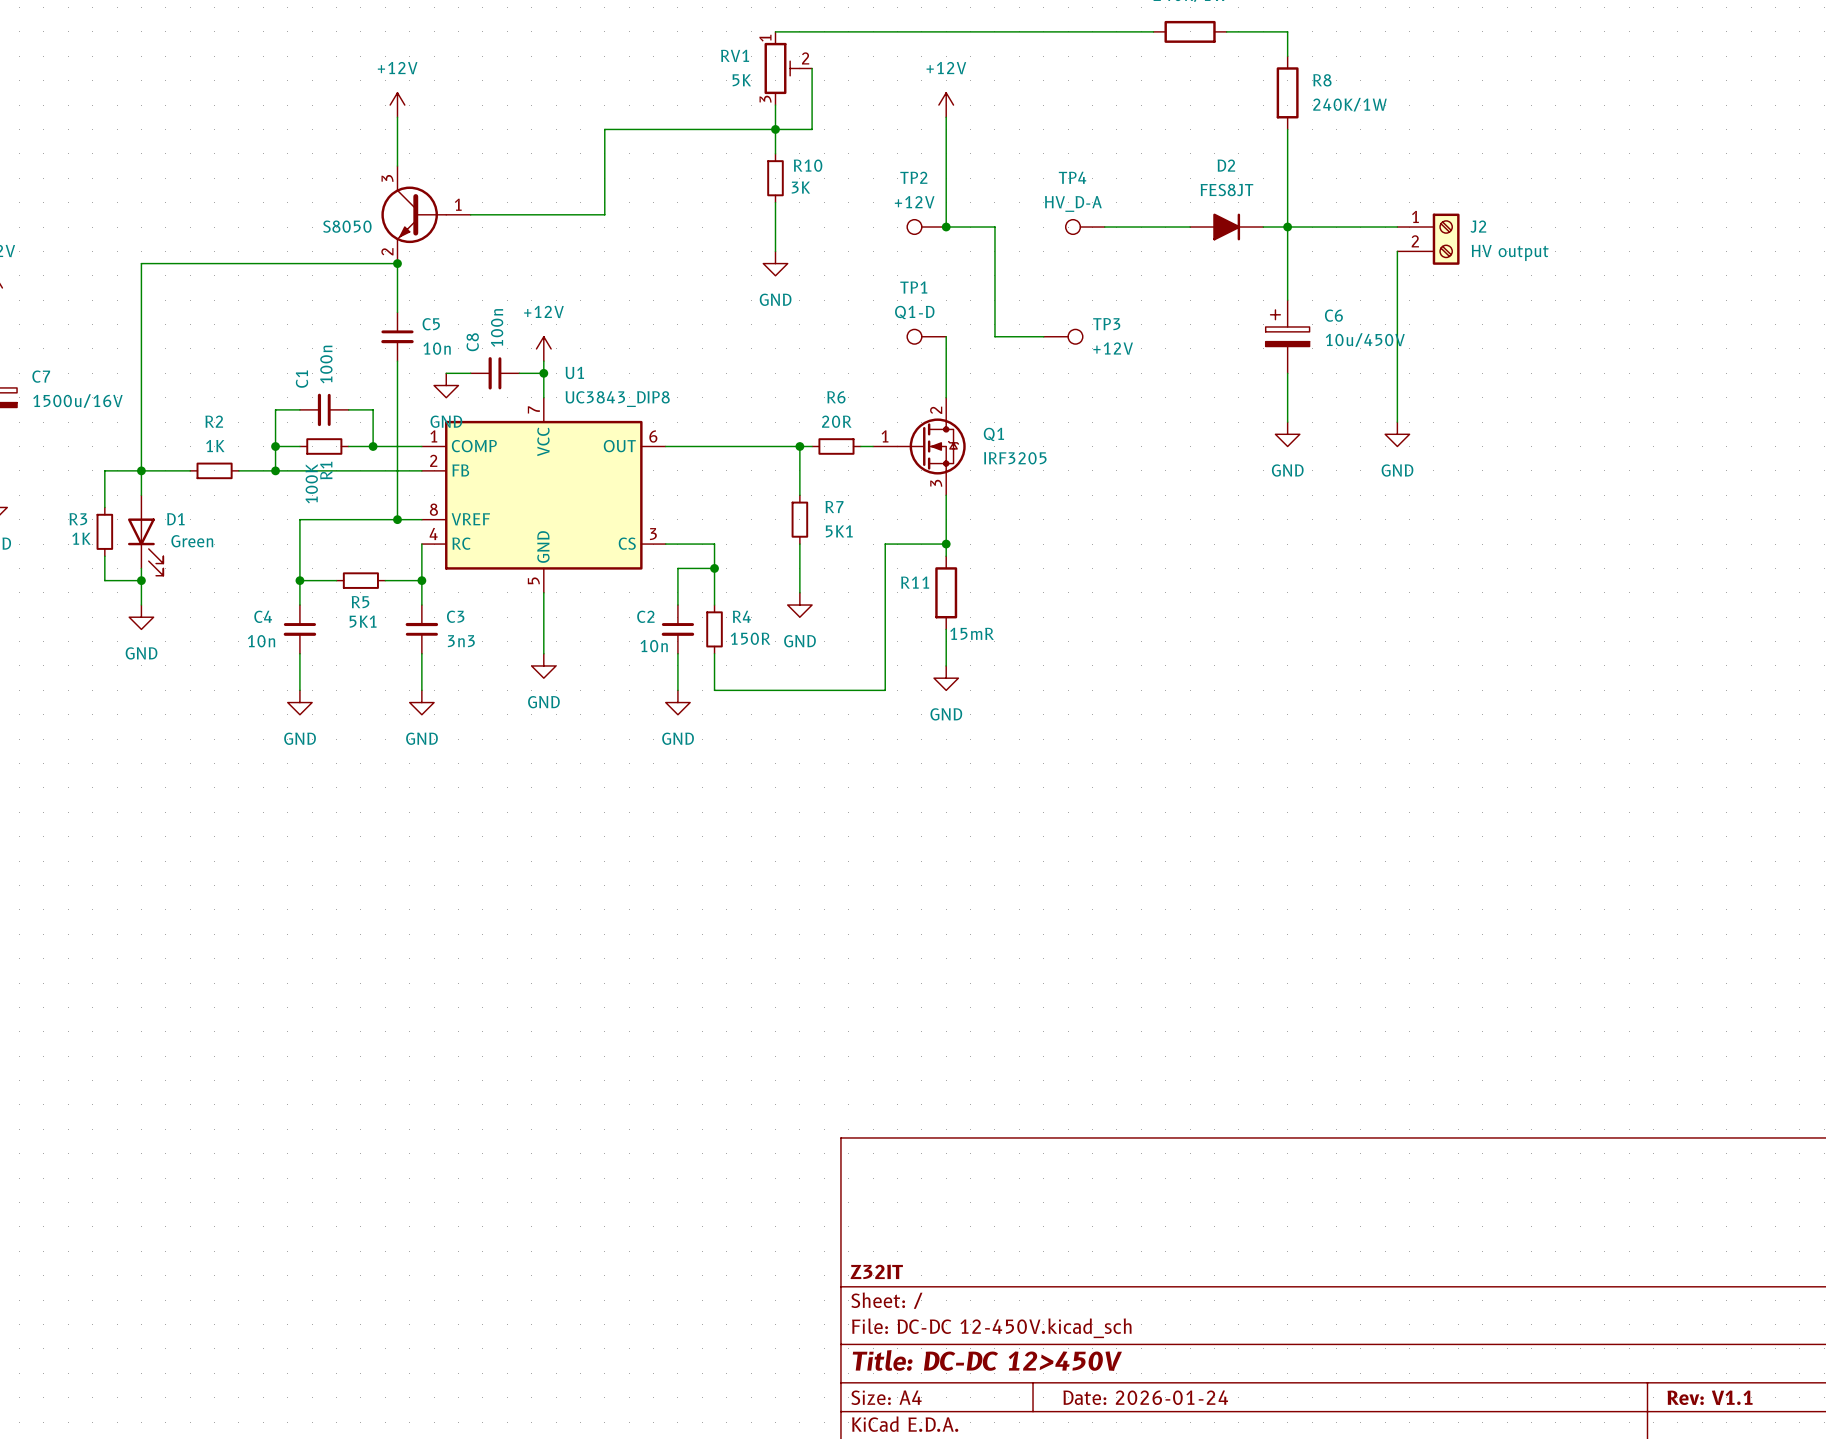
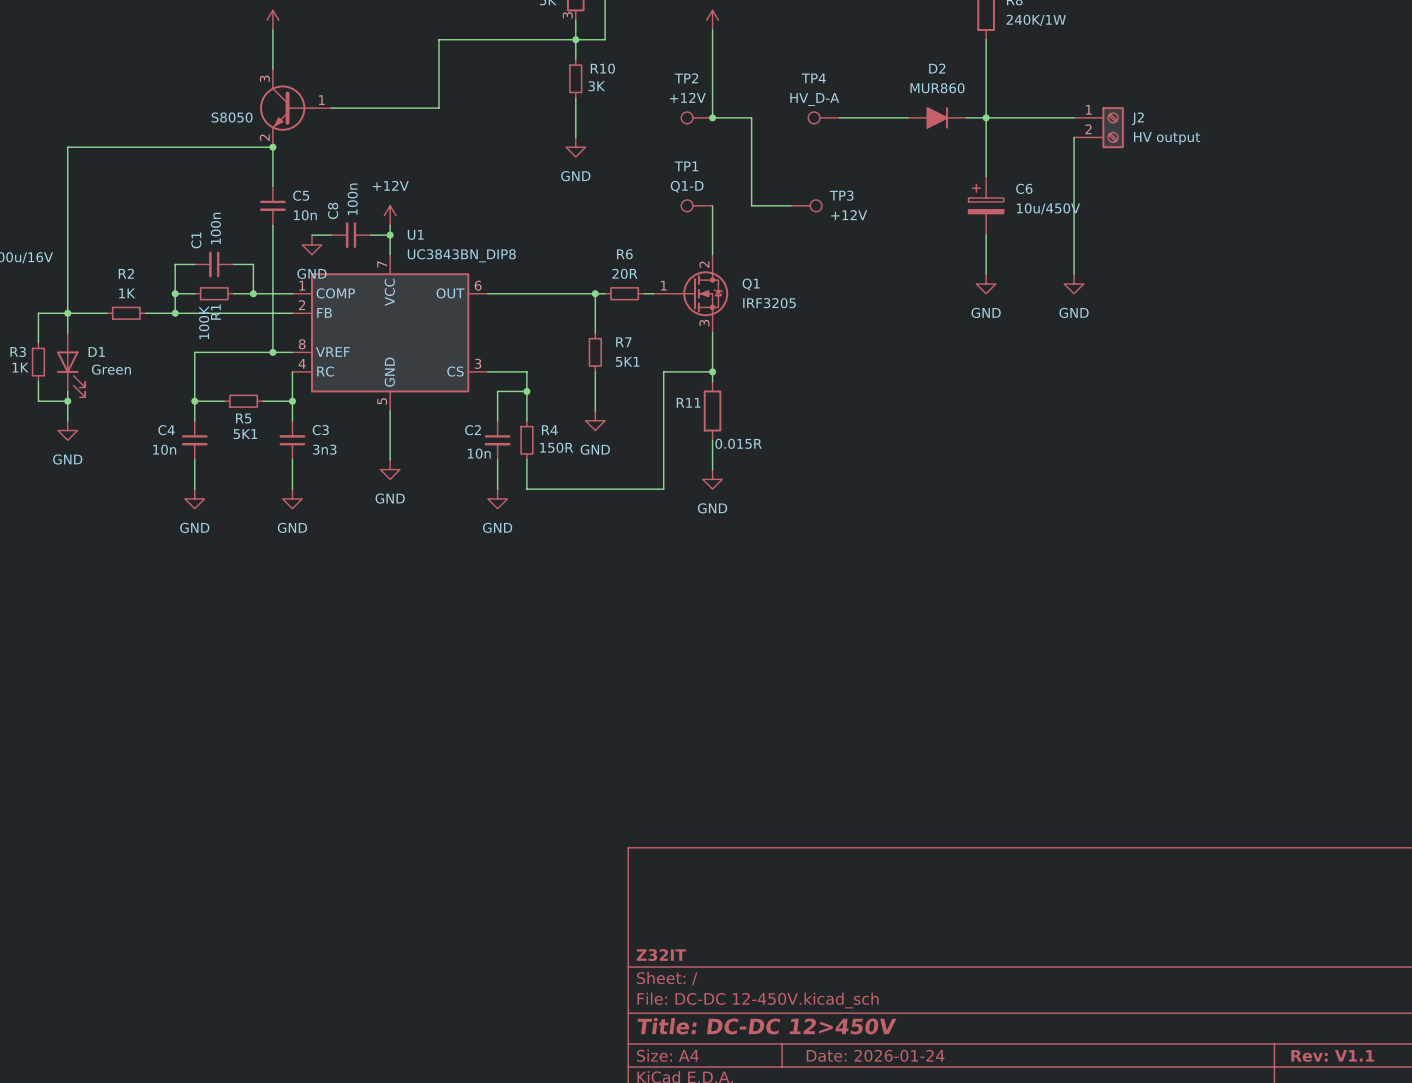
D2 value: FES8JT (1226, 190) -> MUR860 (937, 88)
U1 value: UC3843_DIP8 (617, 399) -> UC3843BN_DIP8 (461, 255)
R11 value: 15mR (972, 633) -> 0.015R (738, 443)

